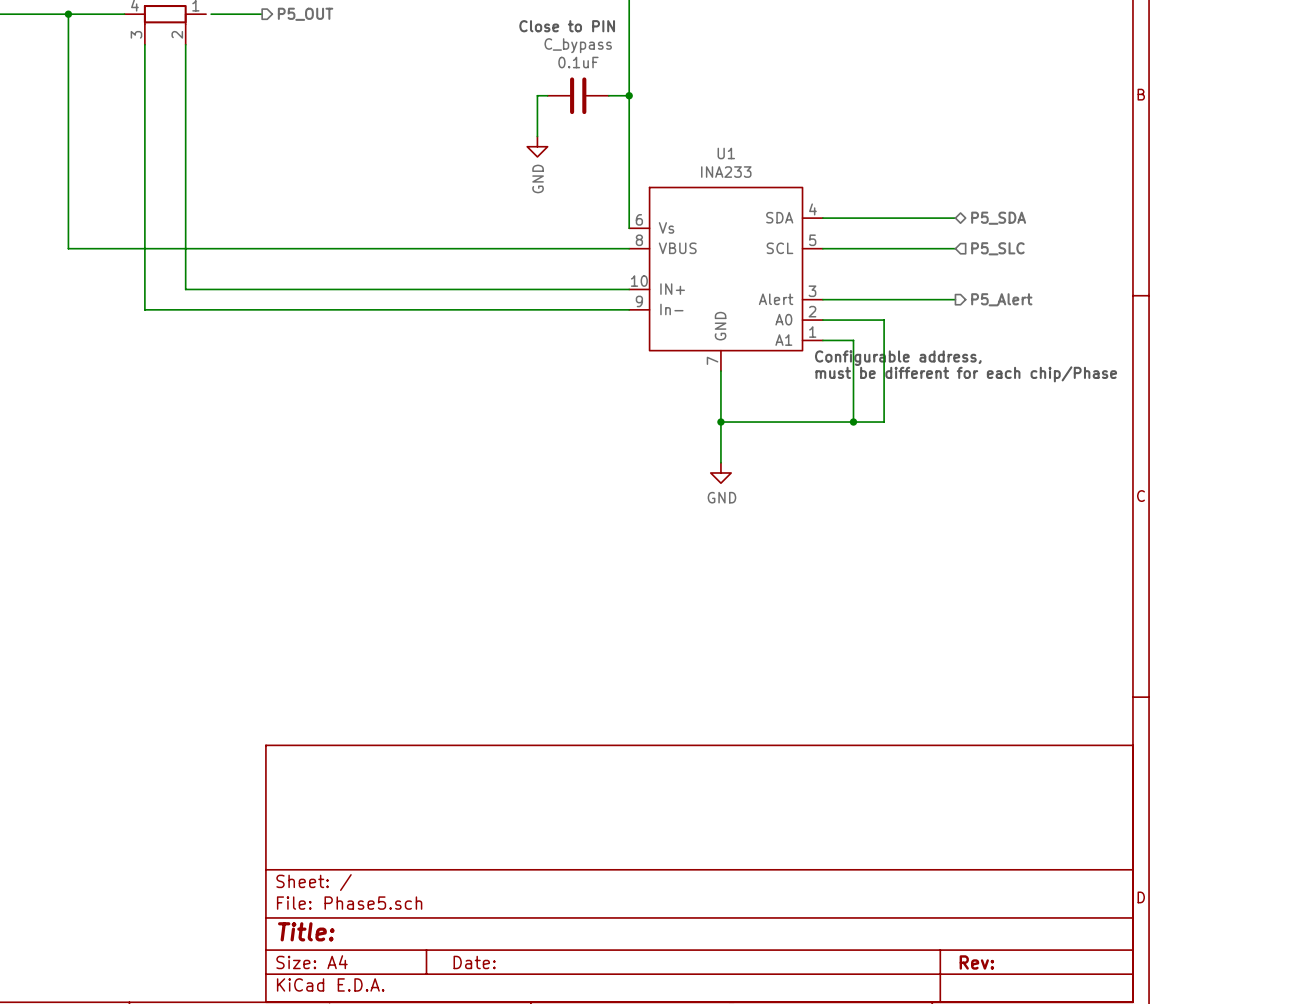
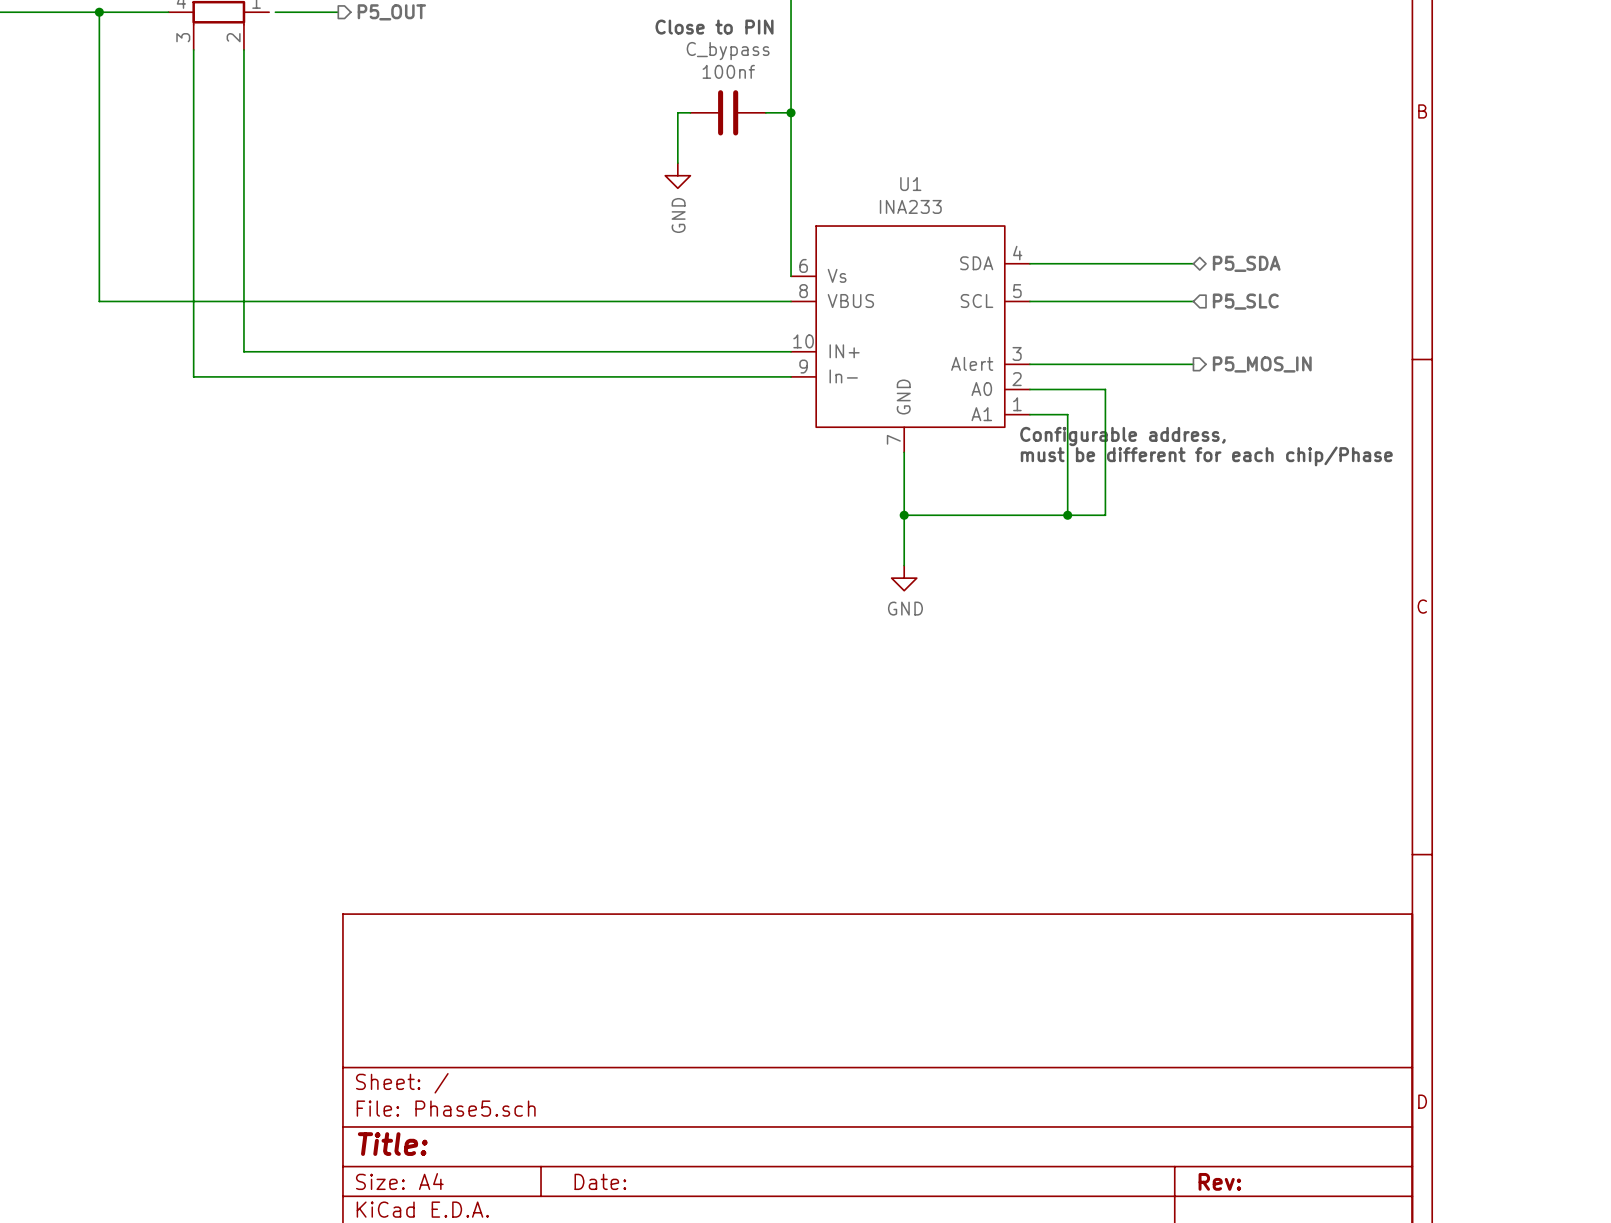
C_bypass value: 0.1uF (578, 62) -> 100nf (728, 71)
hierarchical label: P5_Alert (1001, 299) -> P5_MOS_IN (1262, 364)

